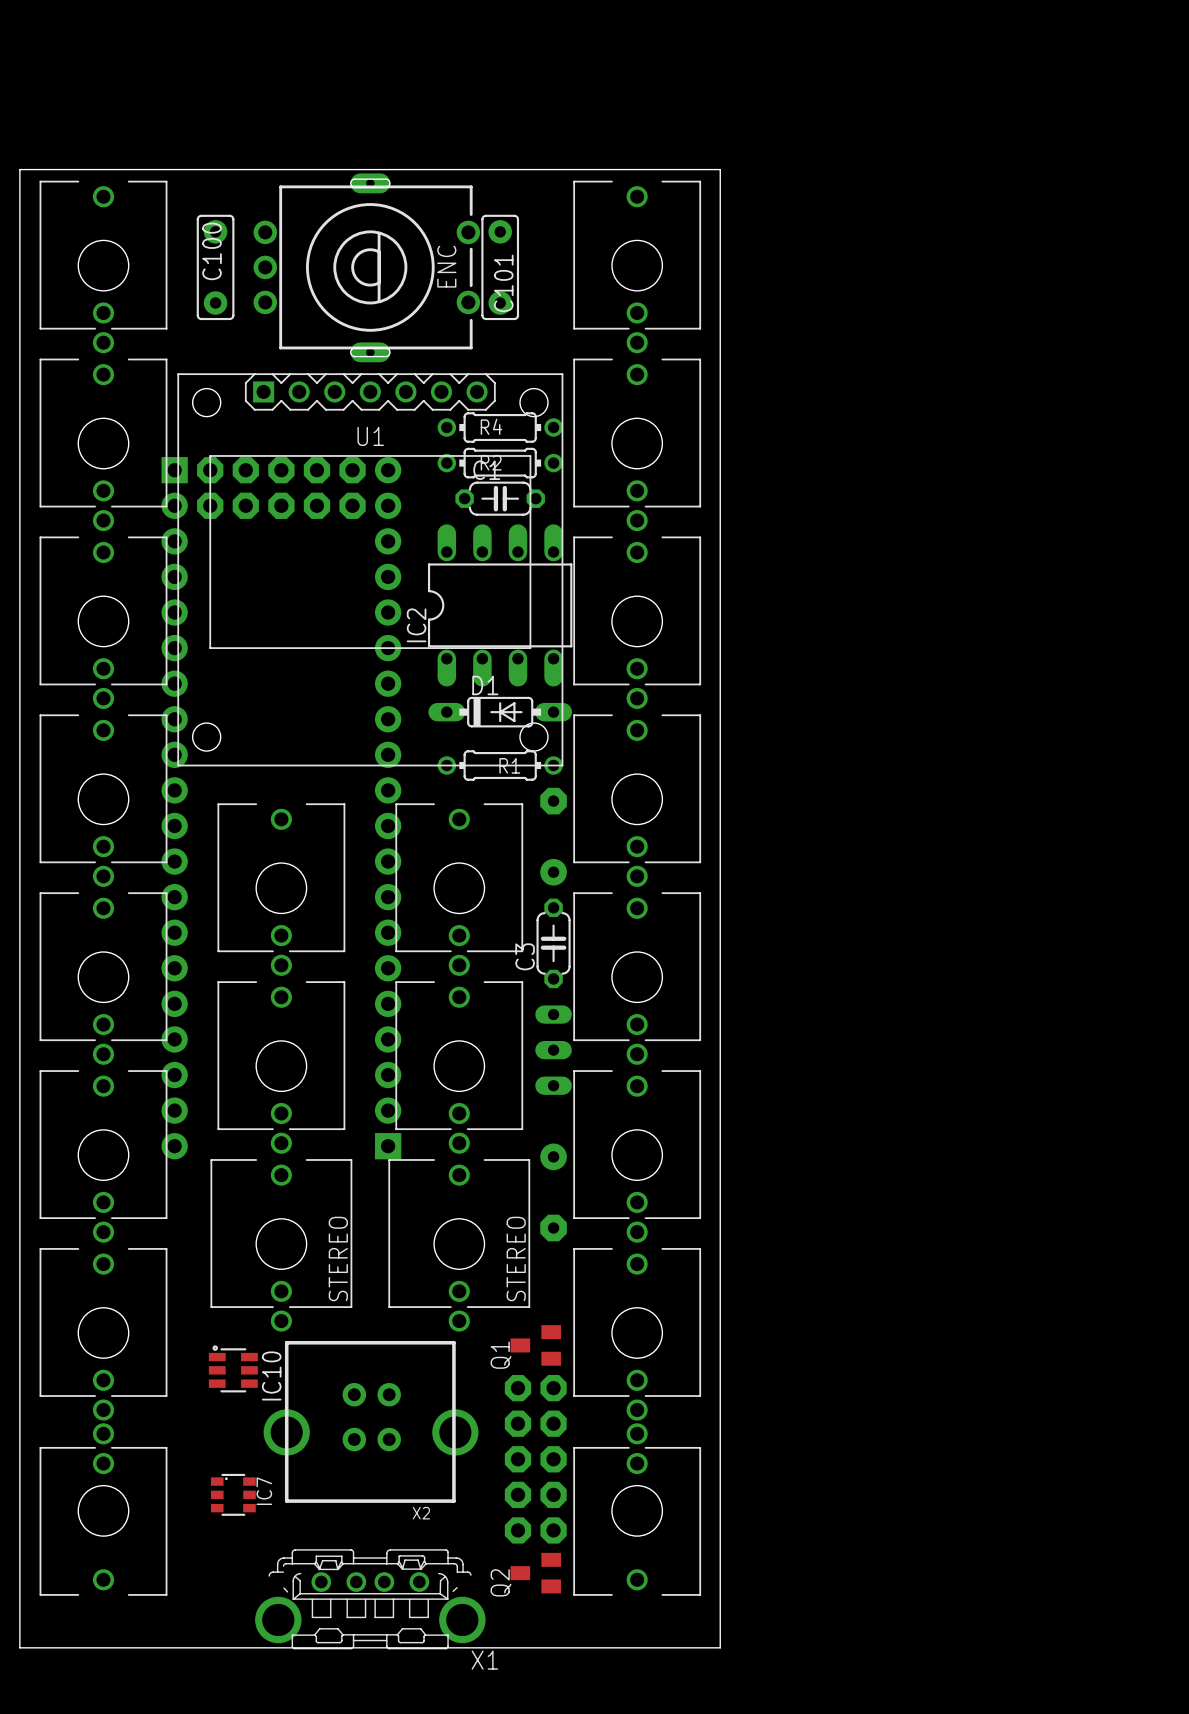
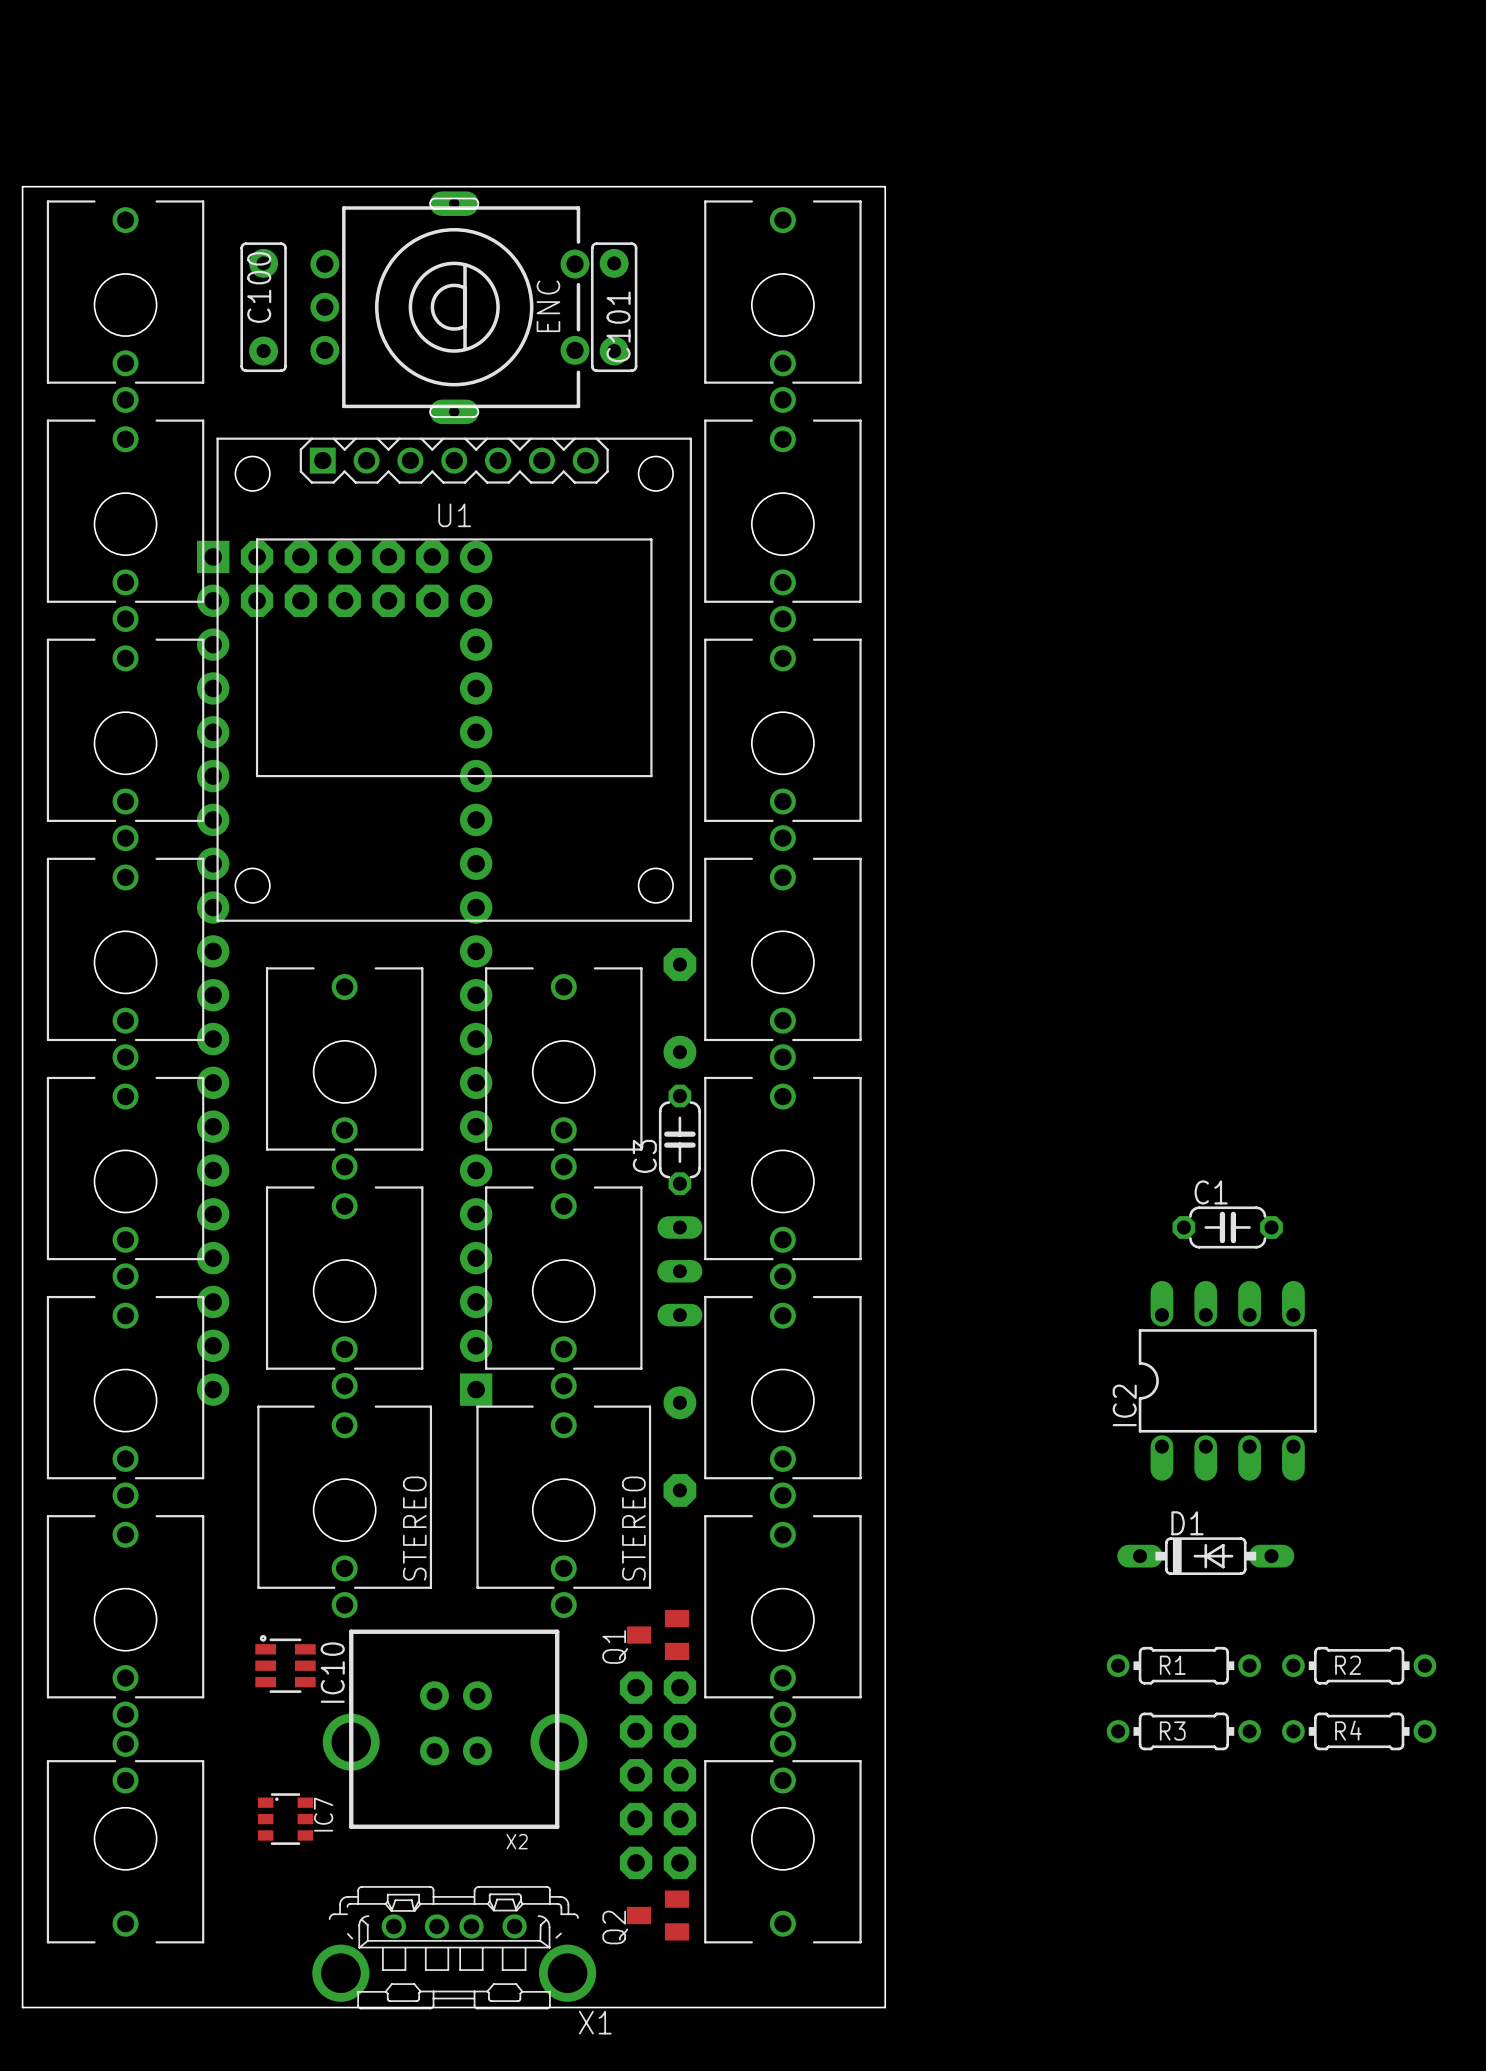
R4 position: (500, 427) -> (1359, 1731)
R2 position: (500, 463) -> (1359, 1665)
C1 position: (500, 498) -> (1227, 1227)
IC2 position: (500, 605) -> (1227, 1380)
D1 position: (500, 712) -> (1205, 1556)
R1 position: (500, 765) -> (1183, 1665)
R1 name position: R1 (509, 765) -> R1 (1172, 1665)
R3: none -> (1183, 1731)

